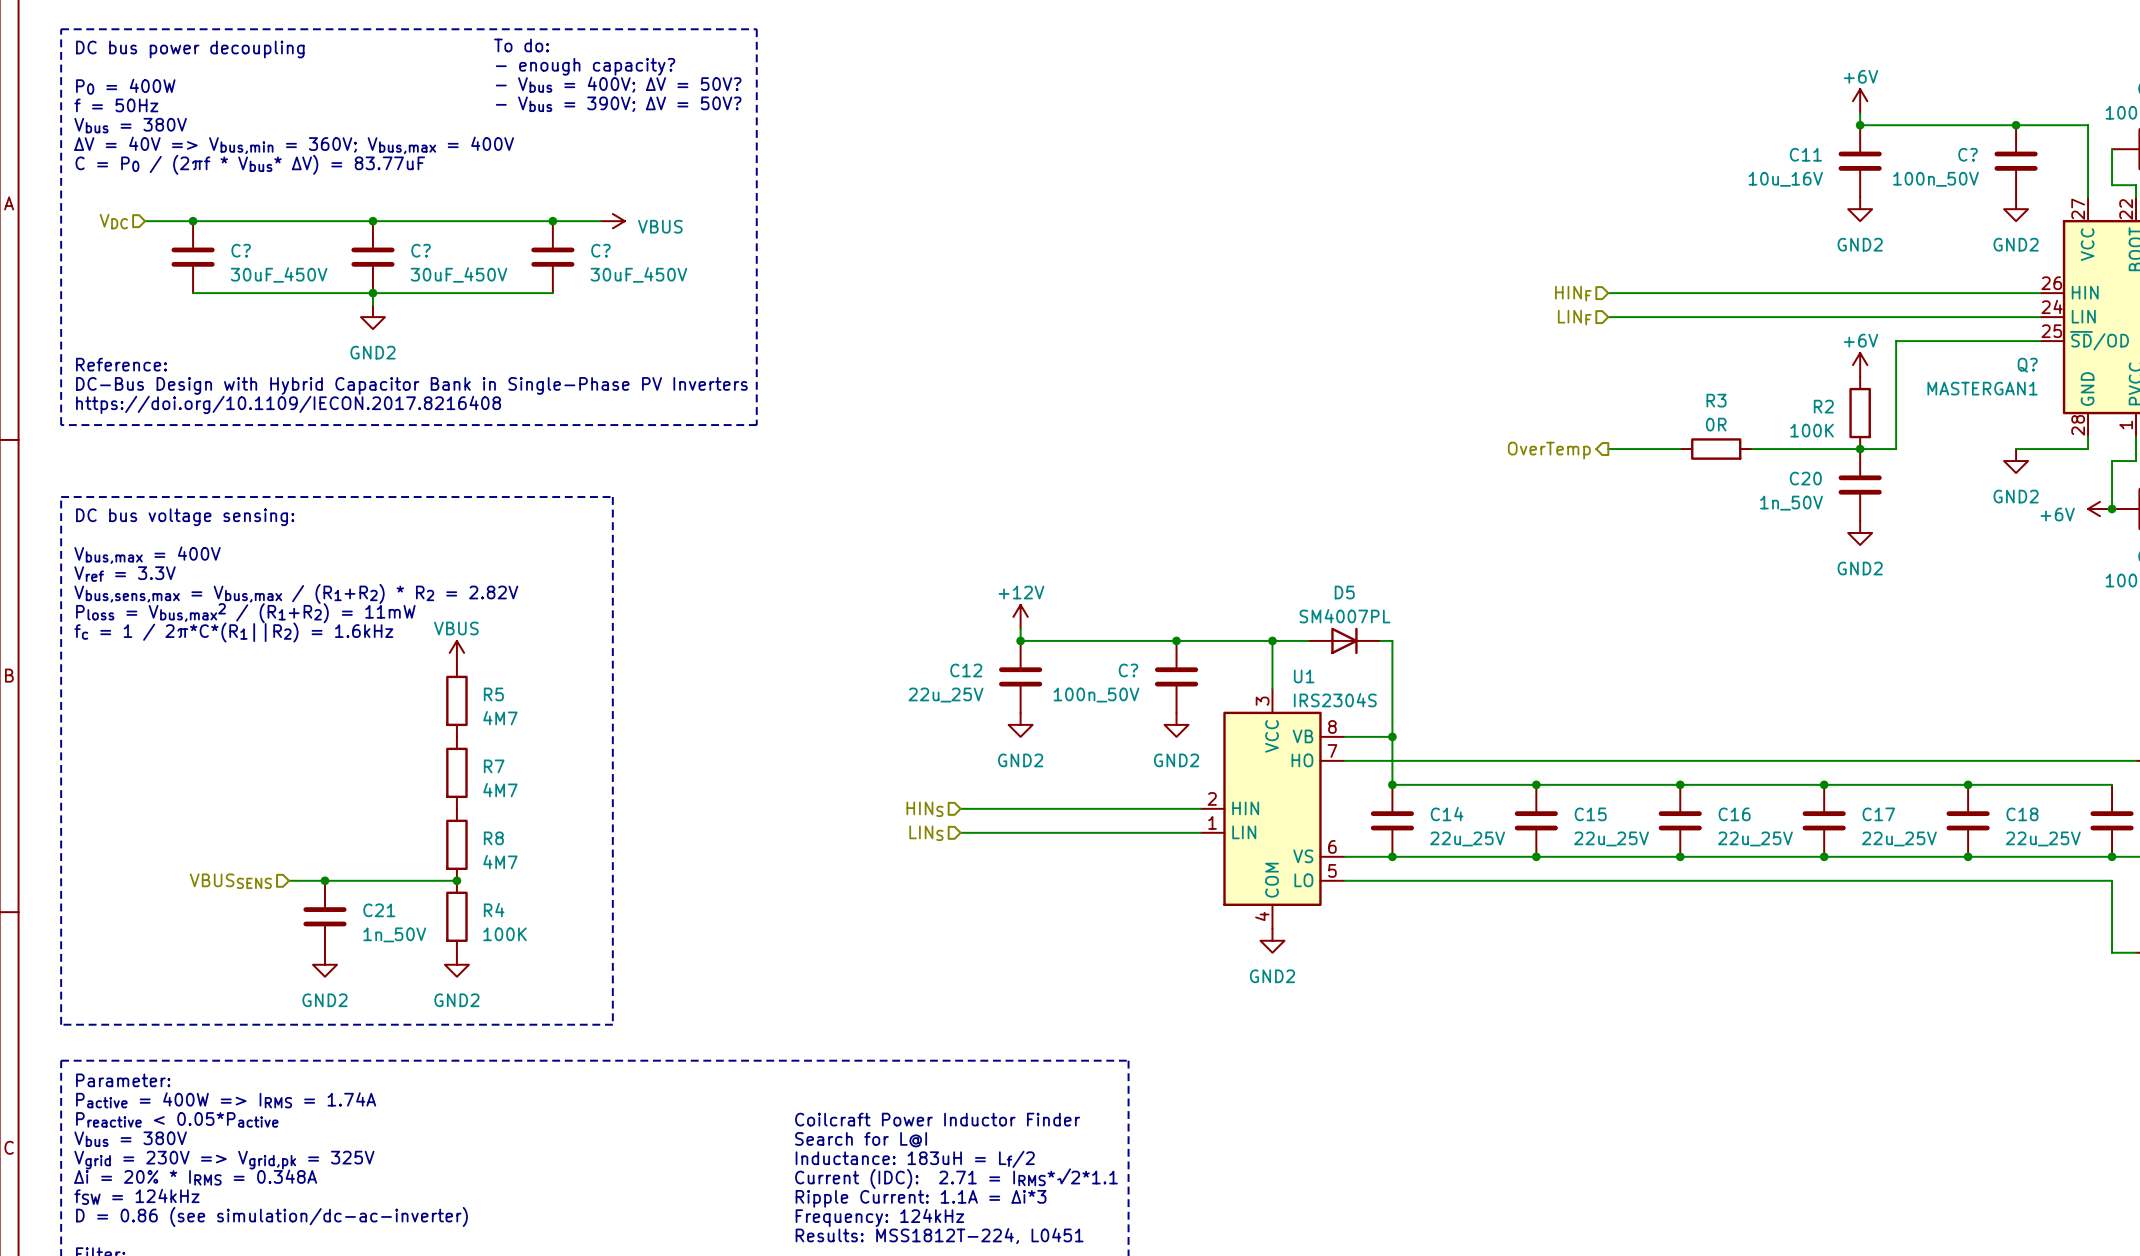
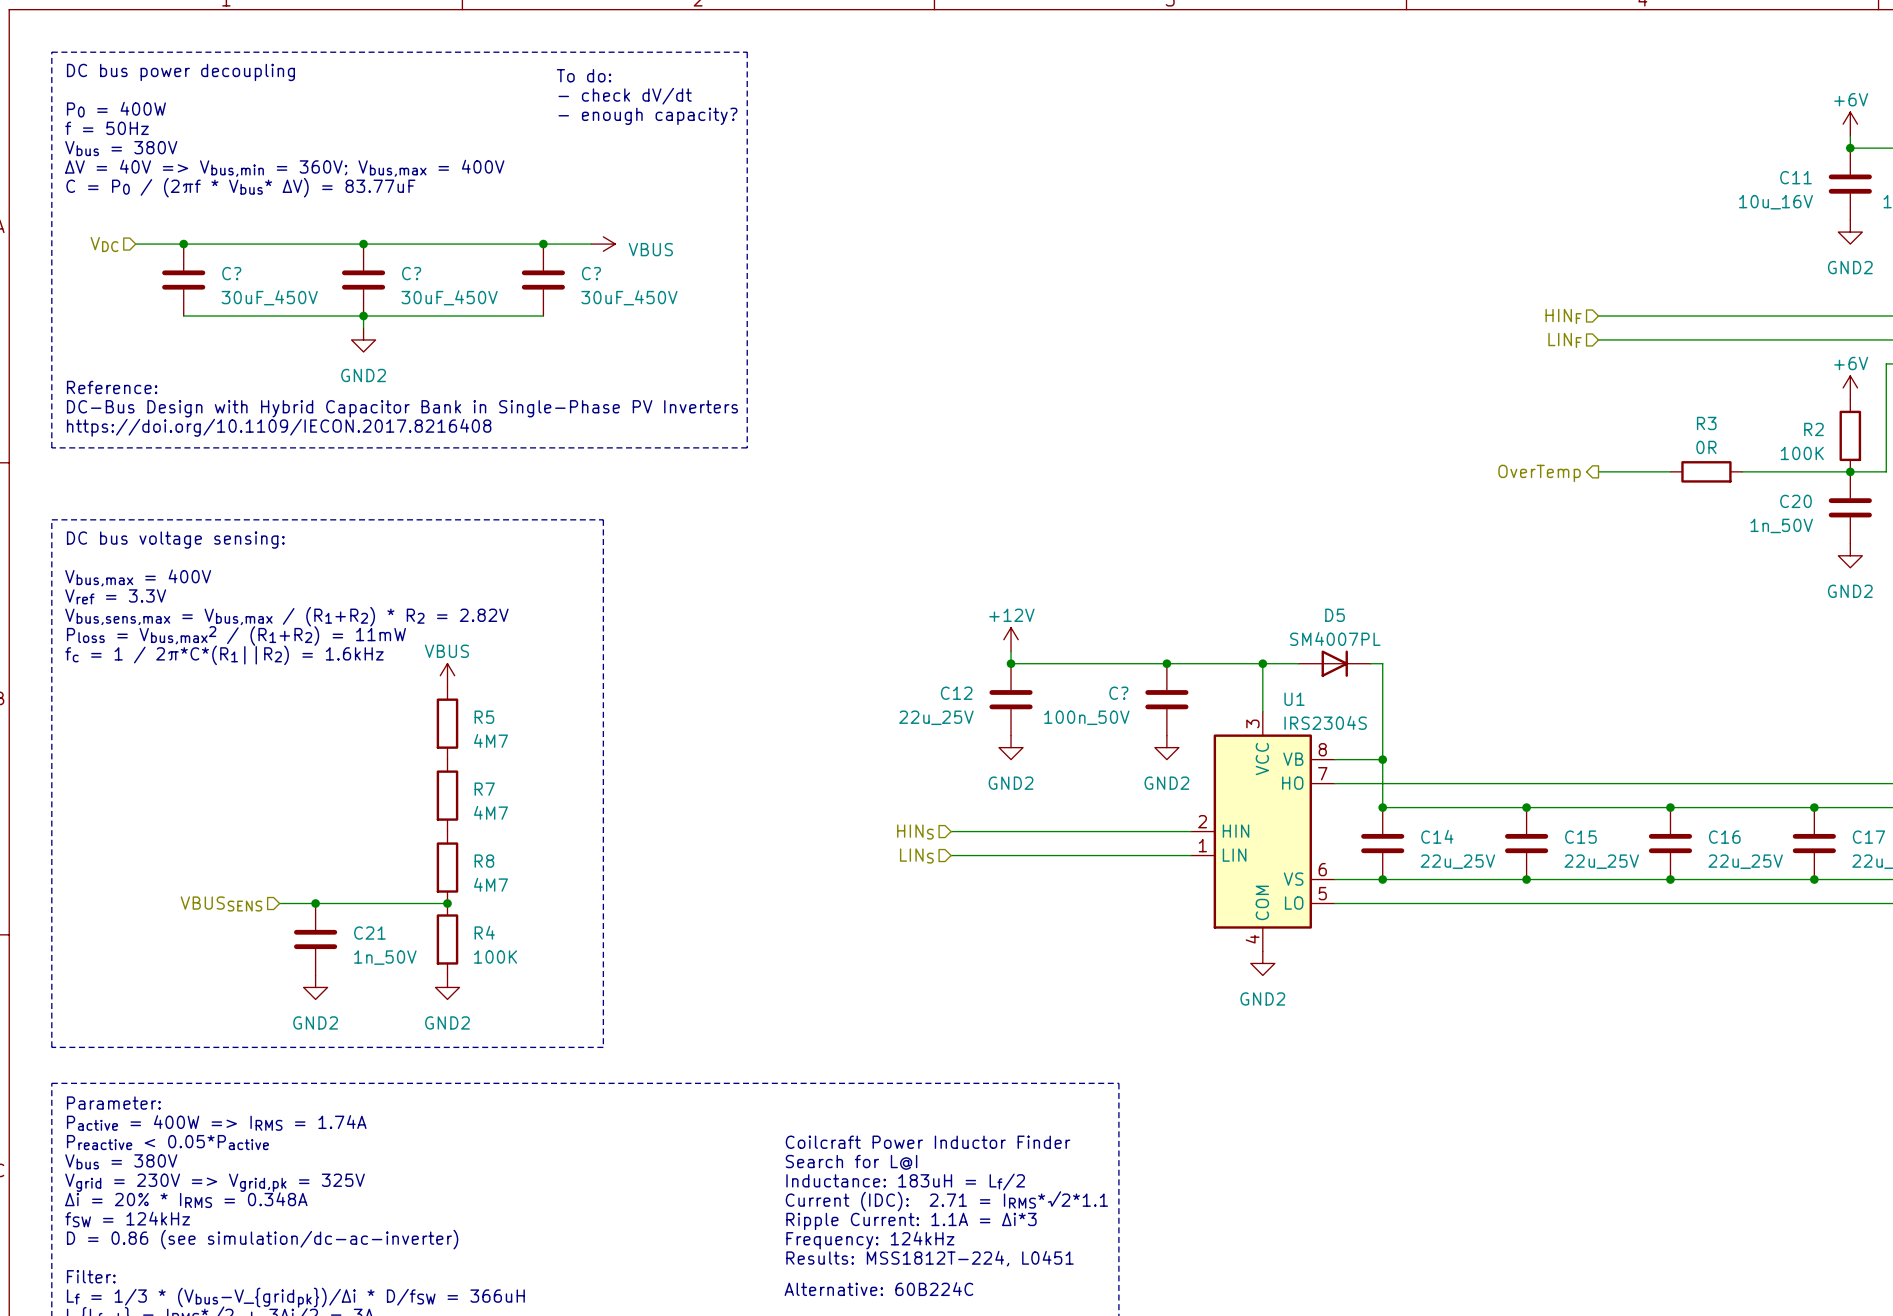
text position: To do: (521, 45) -> To do: (584, 75)
text position: - enough capacity? (585, 66) -> - enough capacity? (647, 116)
text: none -> - check dV/dt (625, 96)
text: - Vbus = 400V; ΔV = 50V? (618, 84) -> none
text: - Vbus = 390V; ΔV = 50V? (618, 104) -> none

